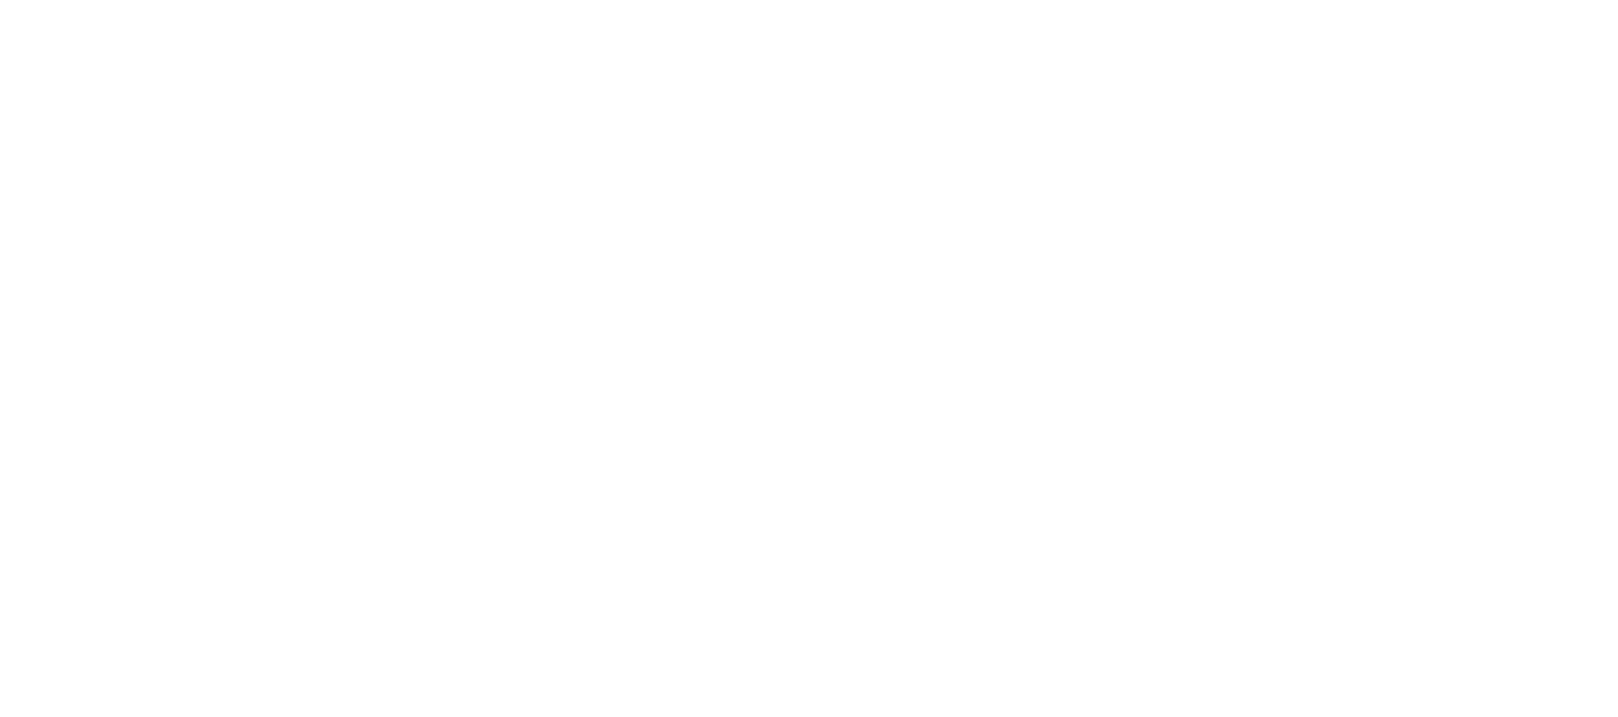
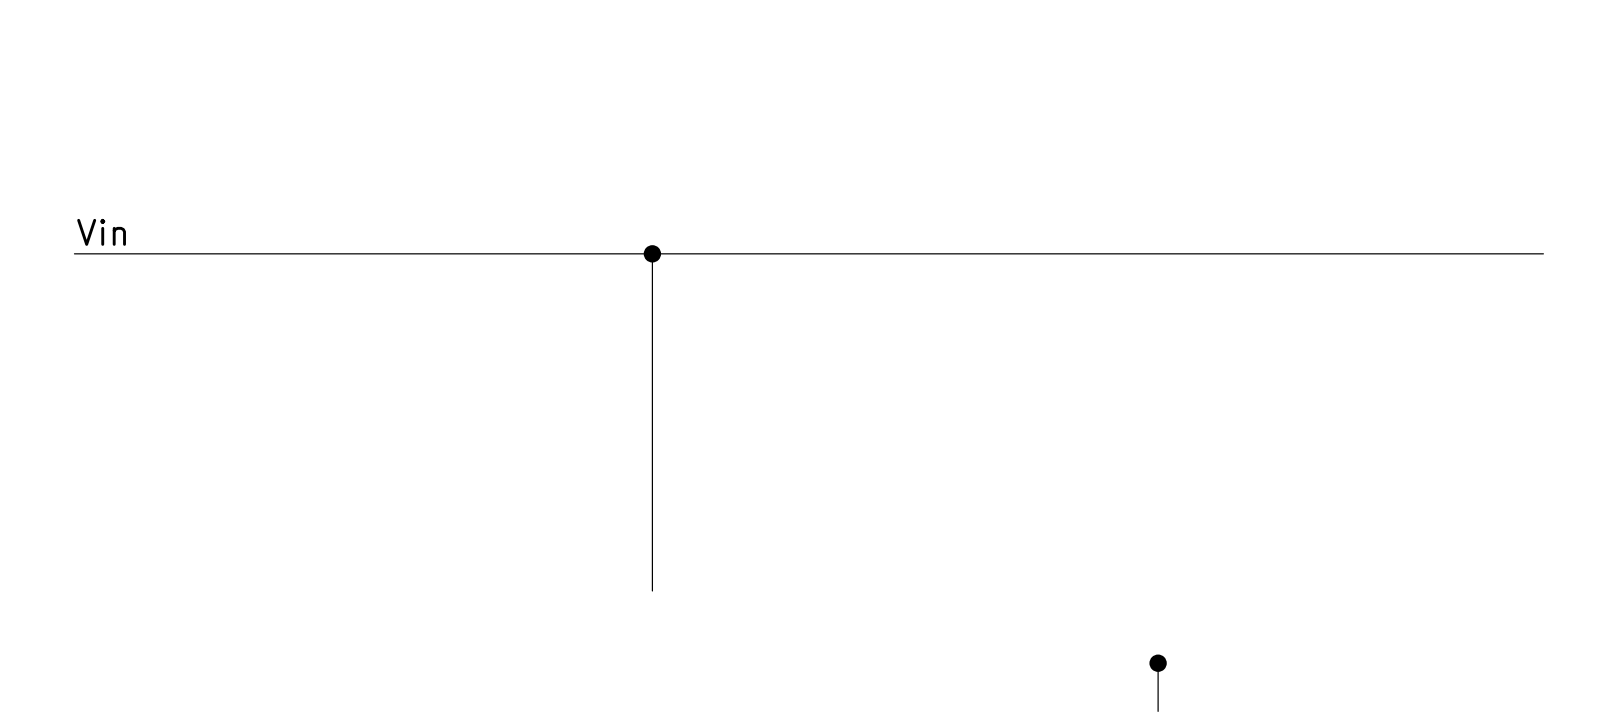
label: none -> Vin (101, 232)
wire: none -> (74, 253) (1543, 253)
wire: none -> (652, 253) (652, 590)
junction: none -> (652, 253)
wire: none -> (1158, 663) (1158, 711)
junction: none -> (1158, 663)

